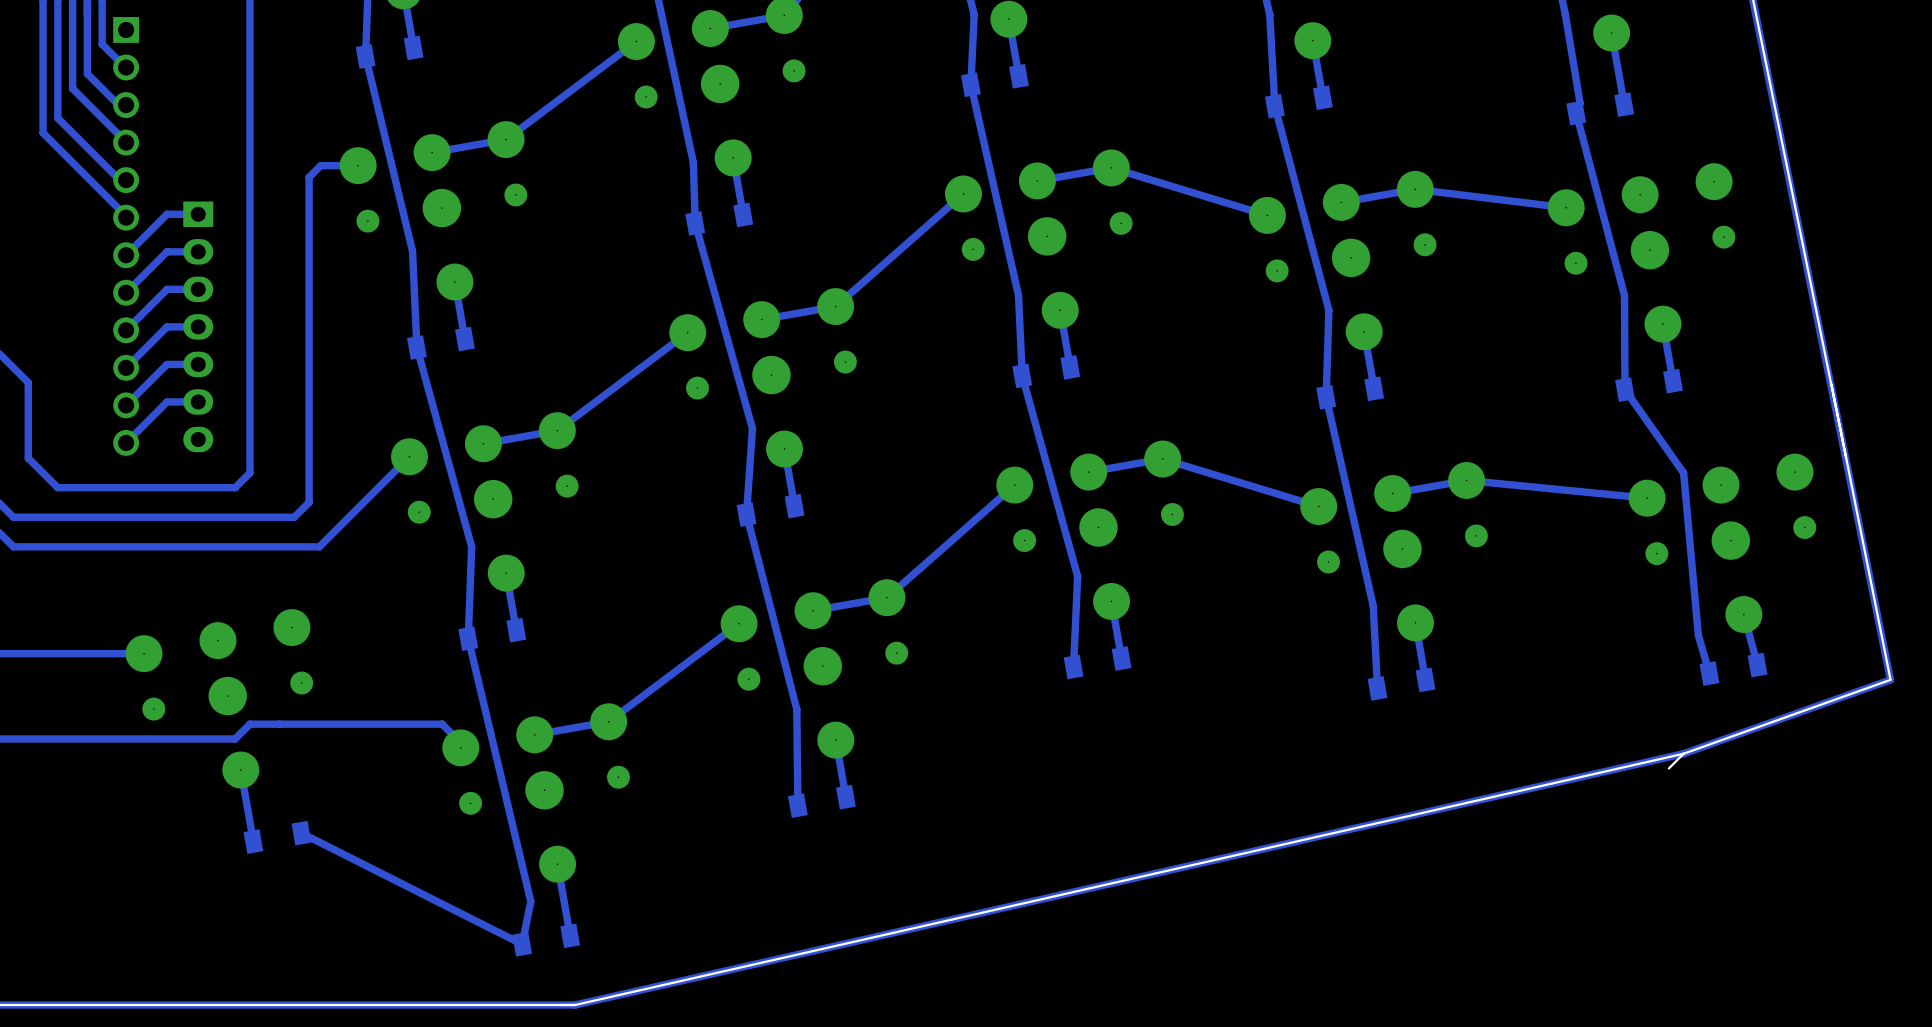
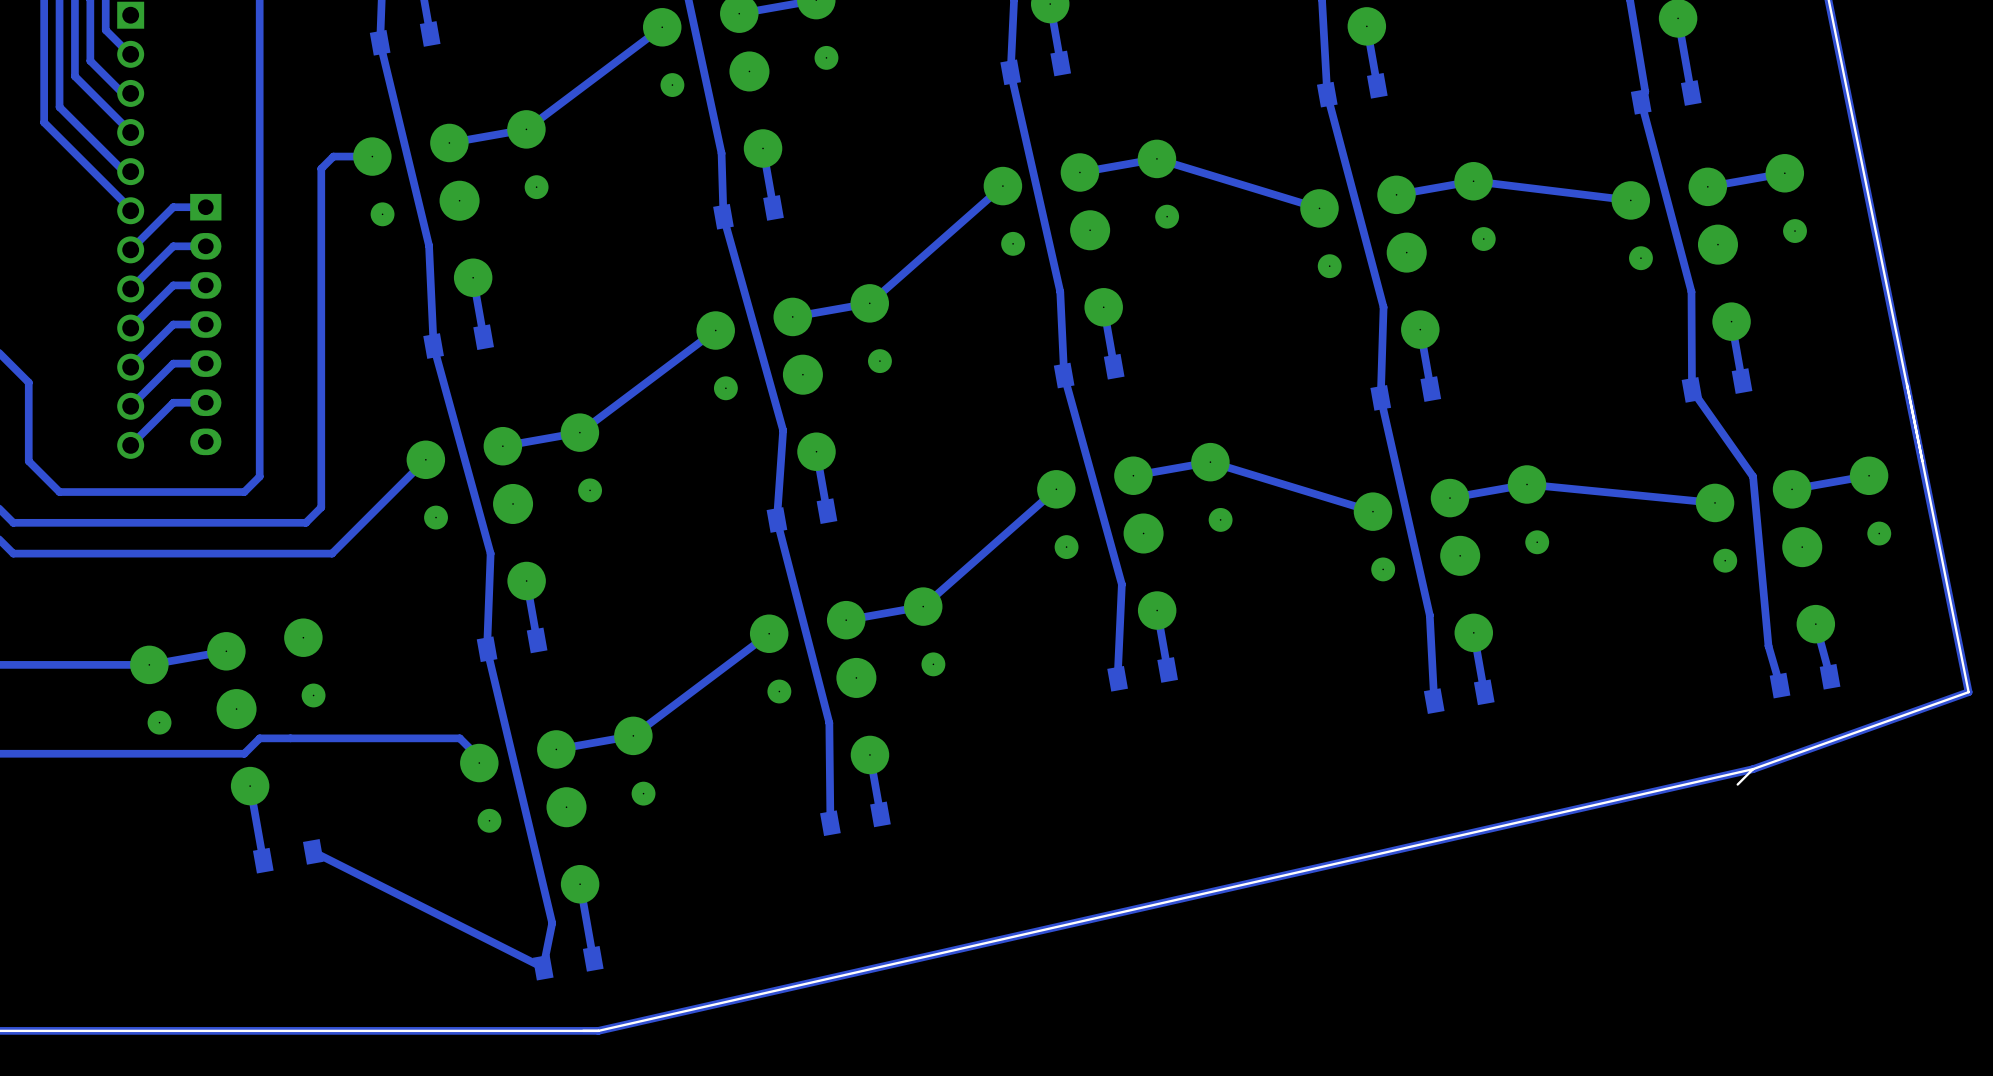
track: none -> (1784, 173) (1707, 186)
track: none -> (1869, 475) (1792, 489)
track: none -> (226, 651) (149, 664)

